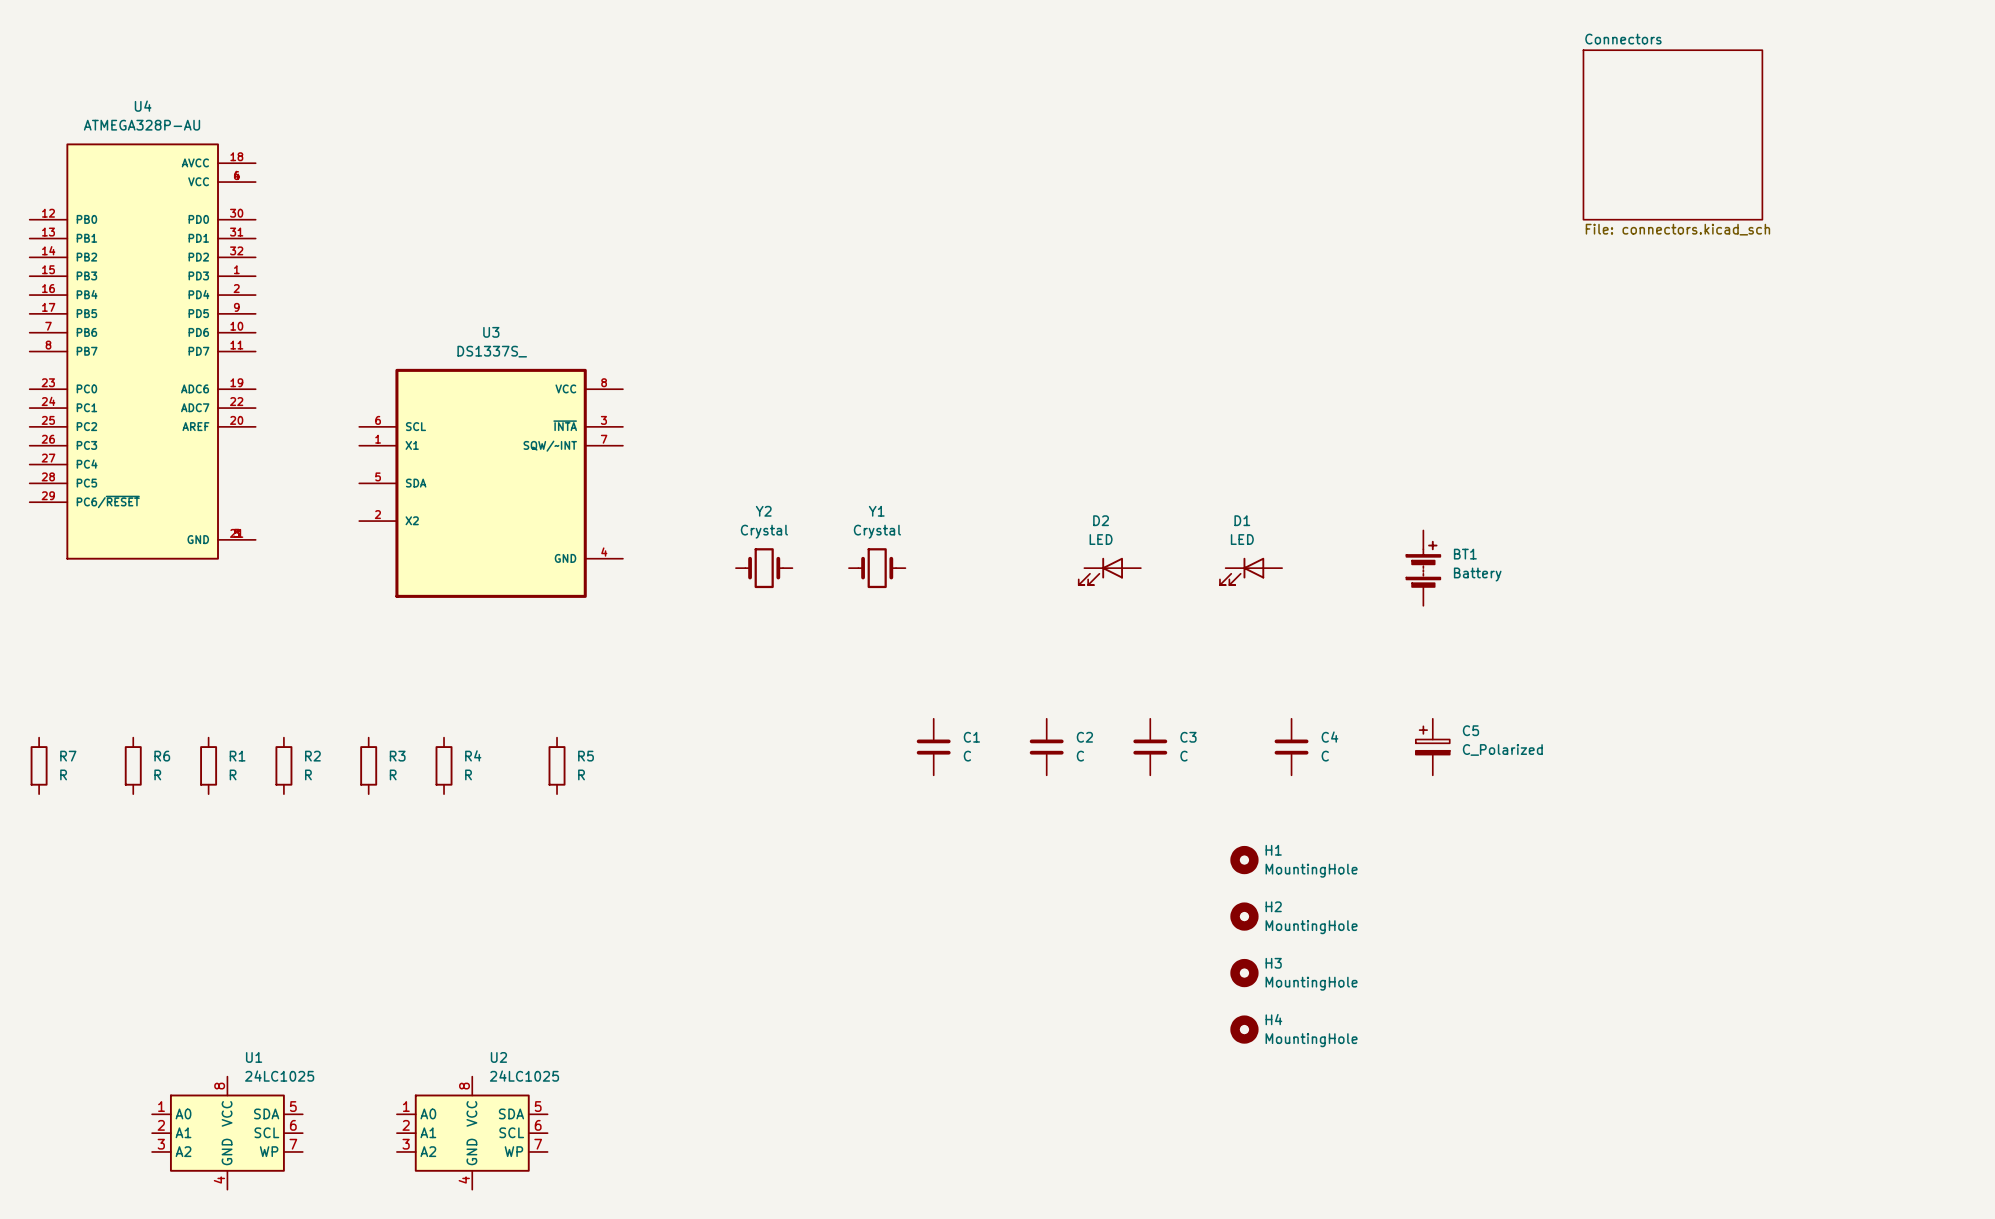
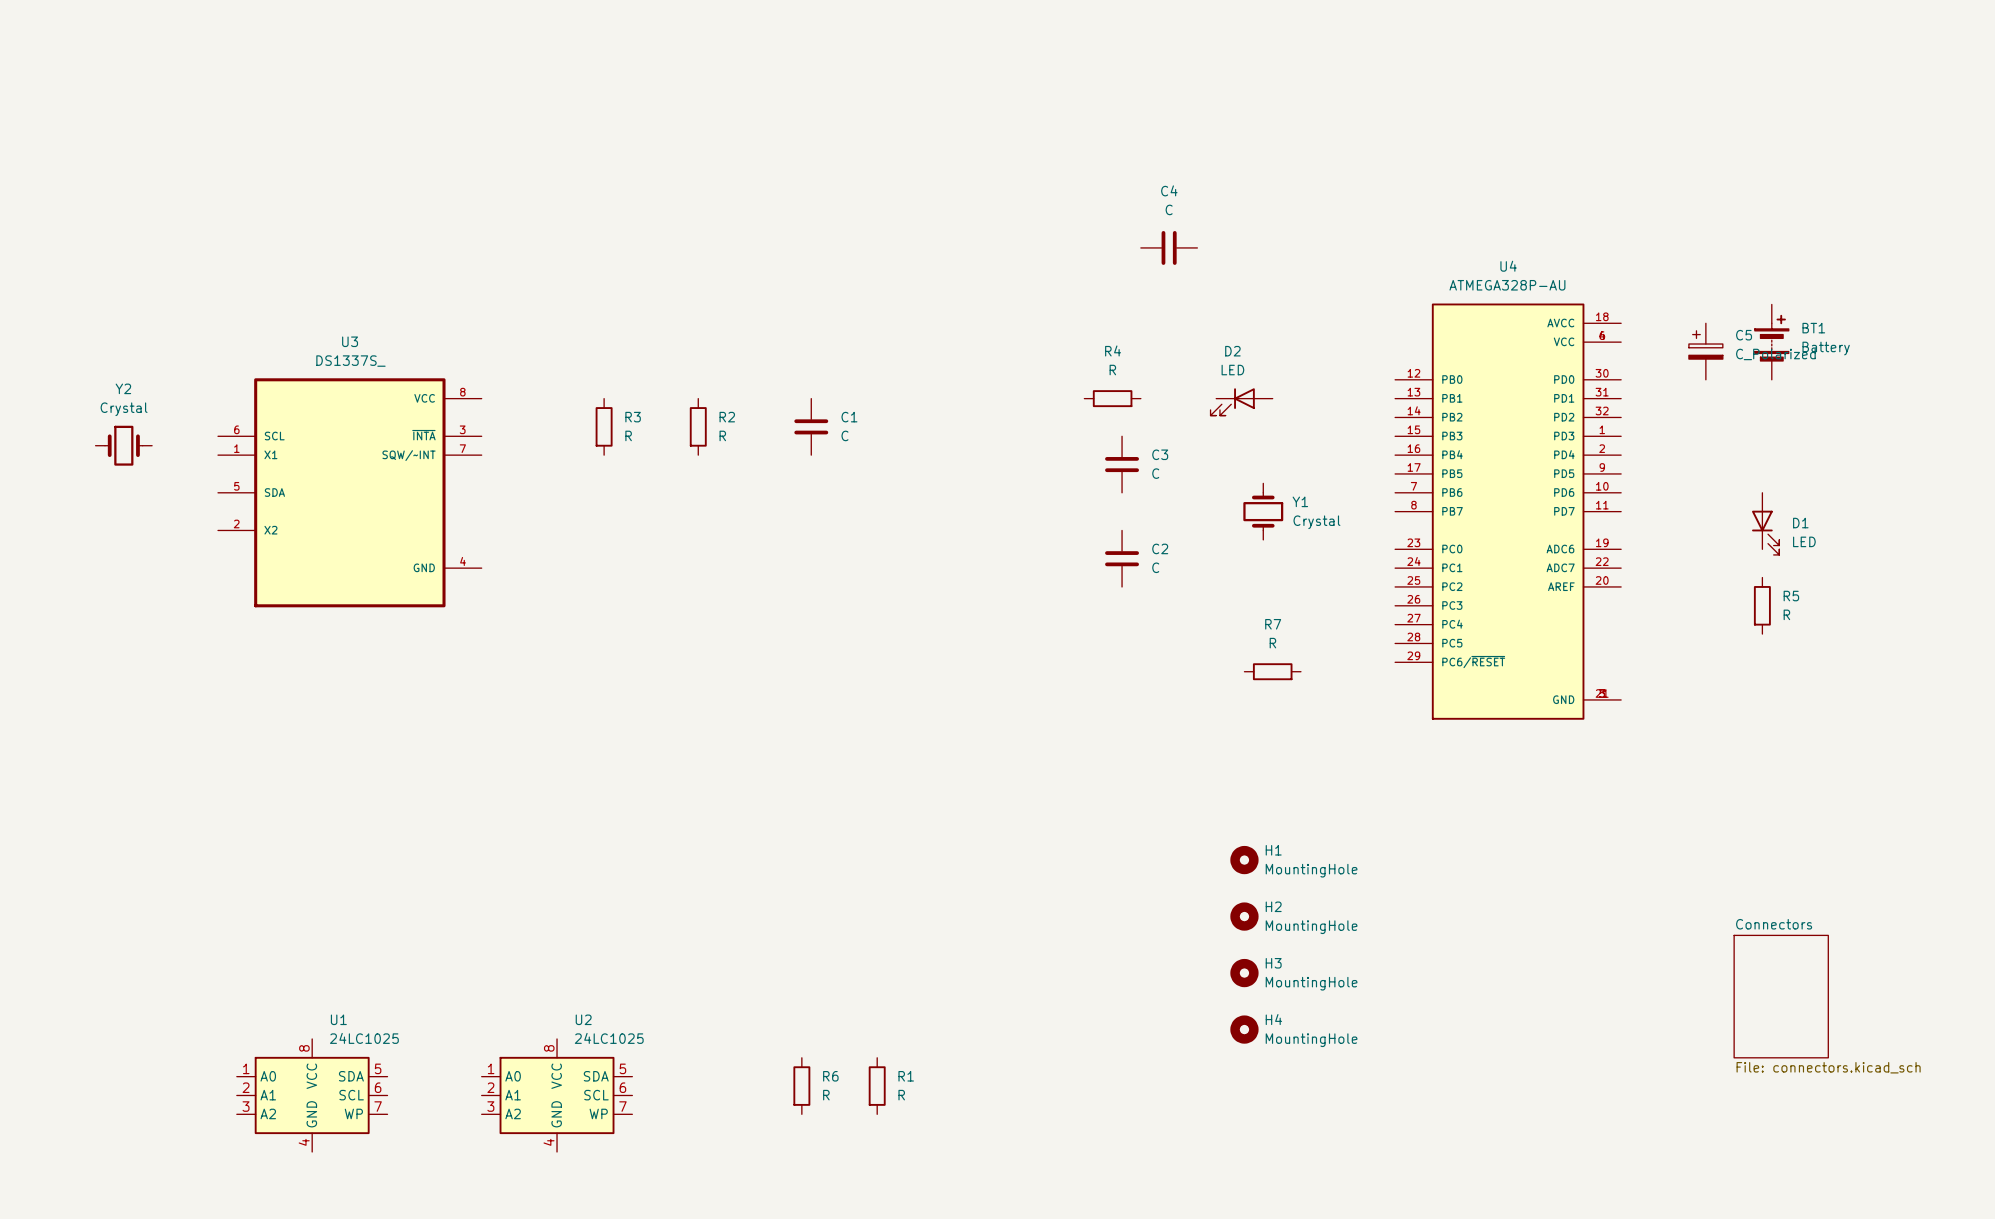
sheet Connectors: File: connectors.kicad_sch (1672, 134) -> none
U4 position: (142, 351) -> (1508, 511)
U3 position: (491, 483) -> (349, 492)
Y1 name position: Y1 (876, 511) -> Y1 (1300, 501)
D1 name position: D1 (1242, 520) -> D1 (1800, 523)
Y1 value position: Crystal (877, 531) -> Crystal (1316, 522)
D1 value position: LED (1242, 539) -> LED (1804, 541)
Y2 position: (764, 568) -> (123, 445)
Y1 rotation: 0° (877, 568) -> 90° clockwise (1263, 511)
Y1 position: (877, 568) -> (1263, 511)
BT1 position: (1423, 568) -> (1771, 342)
D2 position: (1109, 571) -> (1241, 401)
D1 rotation: 0° (1242, 571) -> 90° counterclockwise (1765, 532)
D1 position: (1251, 571) -> (1765, 523)
C4 name position: C4 (1329, 737) -> C4 (1169, 190)
C1 position: (933, 747) -> (811, 426)
C2 position: (1046, 747) -> (1122, 558)
C3 position: (1150, 747) -> (1122, 464)
C4 rotation: 0° (1291, 747) -> 90° clockwise (1169, 247)
C4 position: (1291, 747) -> (1169, 247)
C5 position: (1432, 747) -> (1705, 351)
R4 name position: R4 (473, 755) -> R4 (1113, 350)
R7 name position: R7 (68, 756) -> R7 (1273, 624)
C4 value position: C (1325, 756) -> C (1169, 209)
R7 rotation: 0° (39, 765) -> 90° clockwise (1272, 671)
R7 position: (39, 765) -> (1272, 671)
R6 position: (133, 765) -> (801, 1086)
R1 position: (208, 765) -> (877, 1086)
R2 position: (283, 765) -> (698, 426)
R3 position: (368, 765) -> (604, 426)
R4 rotation: 0° (444, 765) -> 90° clockwise (1112, 398)
R4 position: (444, 765) -> (1112, 398)
R5 position: (557, 765) -> (1762, 605)
R7 value position: R (63, 774) -> R (1272, 643)
R4 value position: R (468, 774) -> R (1112, 370)
sheet Connectors: none -> File: connectors.kicad_sch (1781, 996)
U1 position: (227, 1133) -> (312, 1095)
U2 position: (472, 1133) -> (557, 1095)

